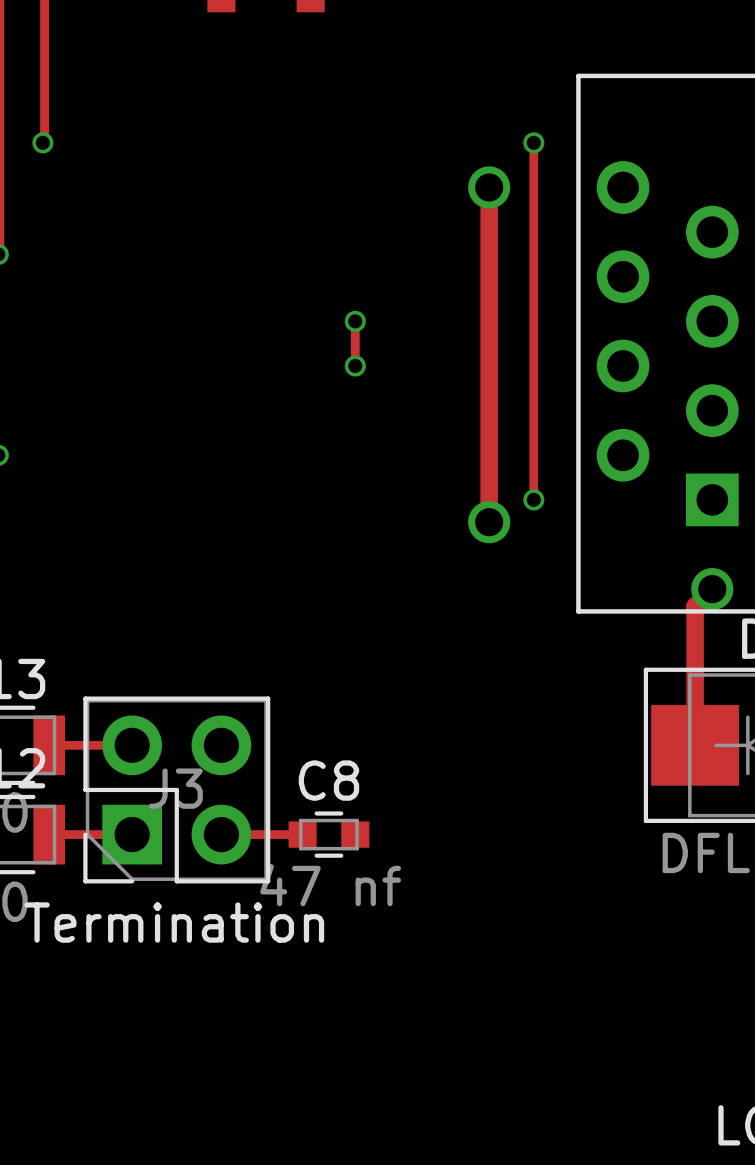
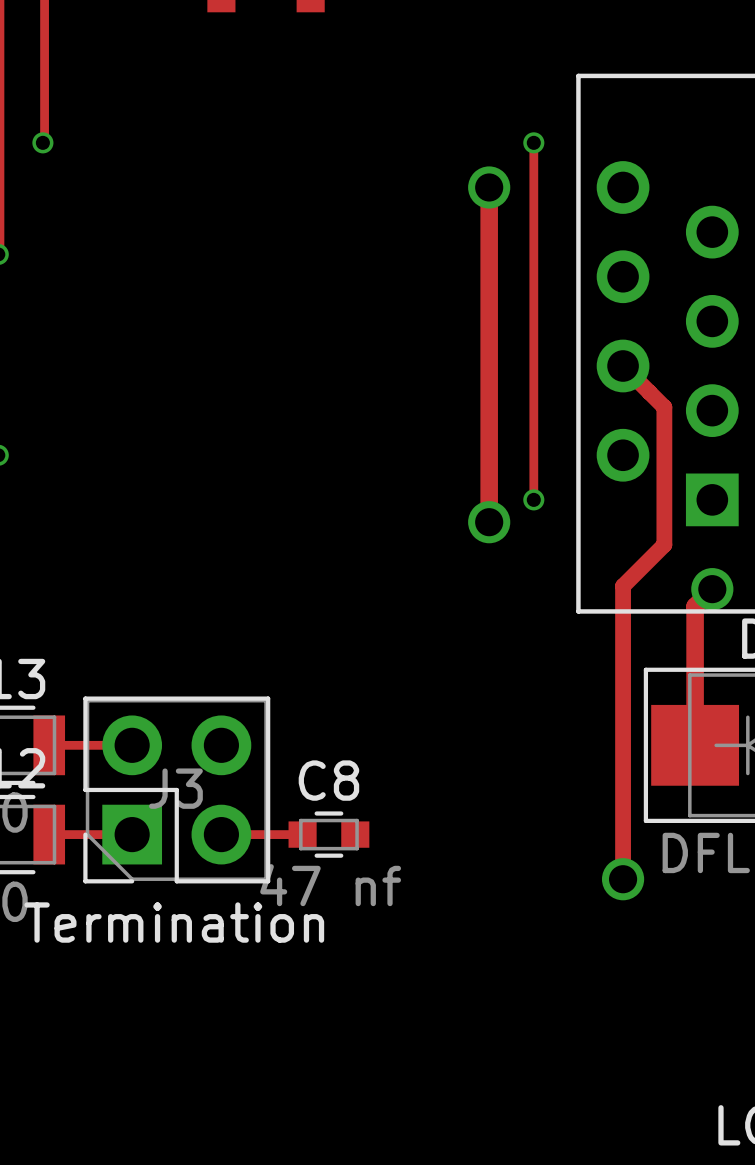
track: (355, 321) (355, 365) -> none
via: (355, 321) -> none
via: (355, 365) -> none
track: none -> (623, 365) (664, 407) (664, 544) (623, 586) (623, 879)
via: none -> (623, 879)

